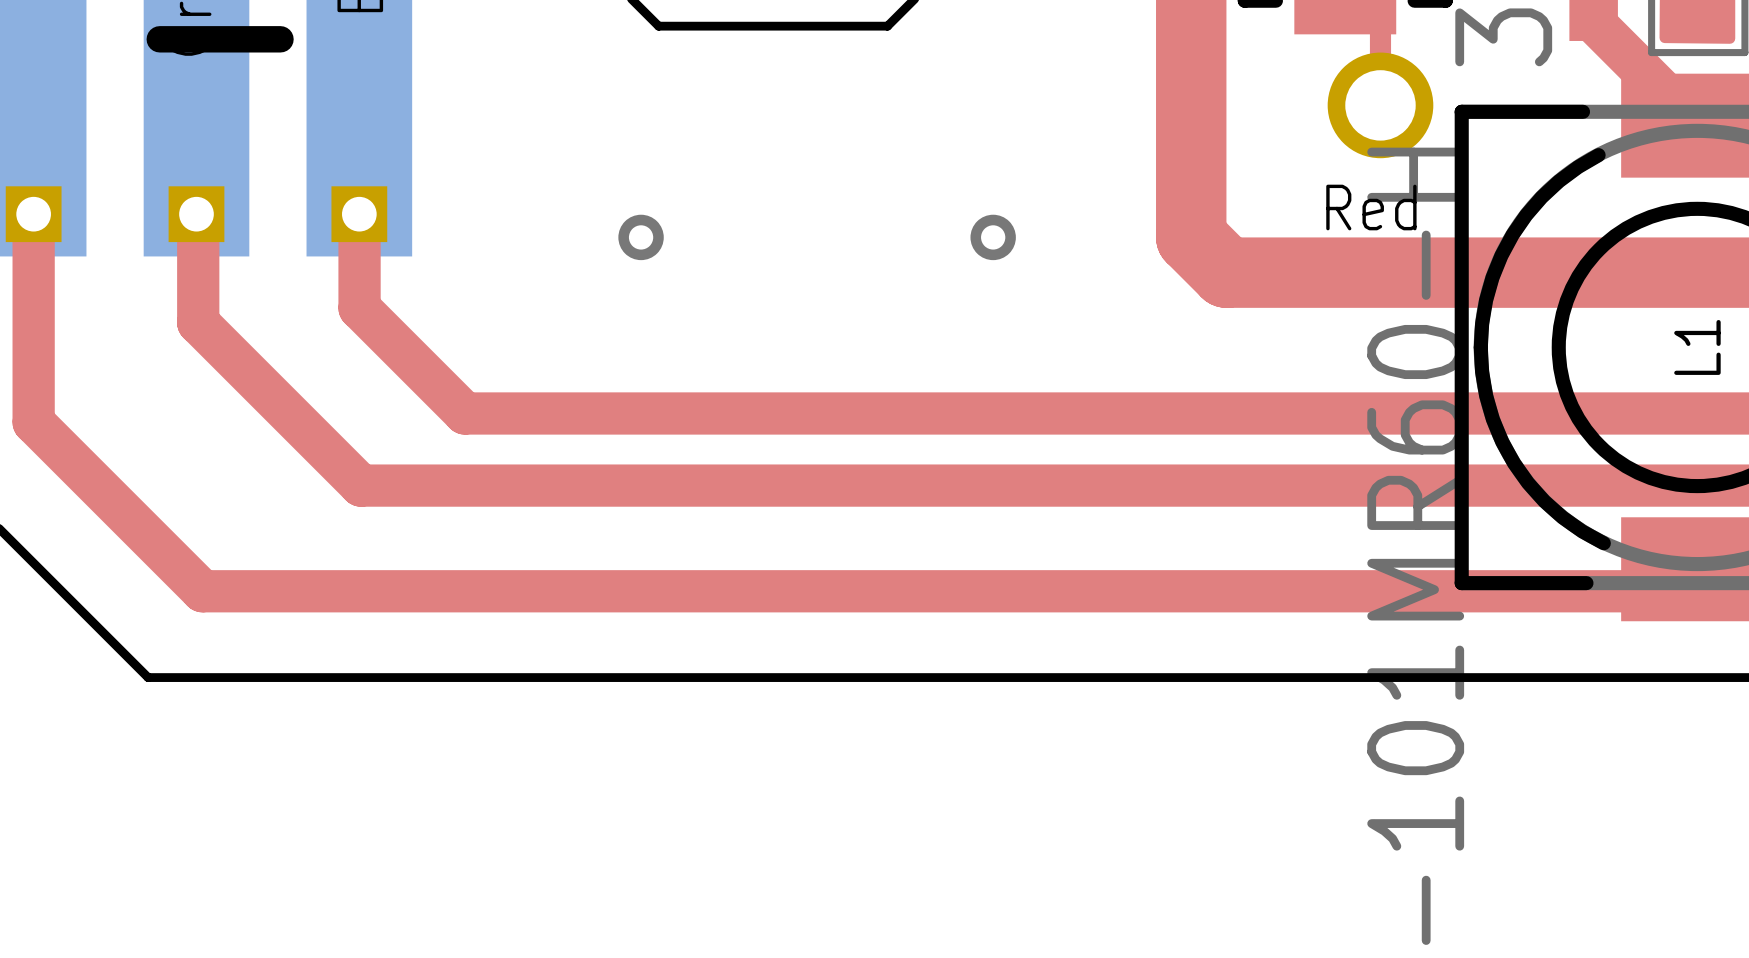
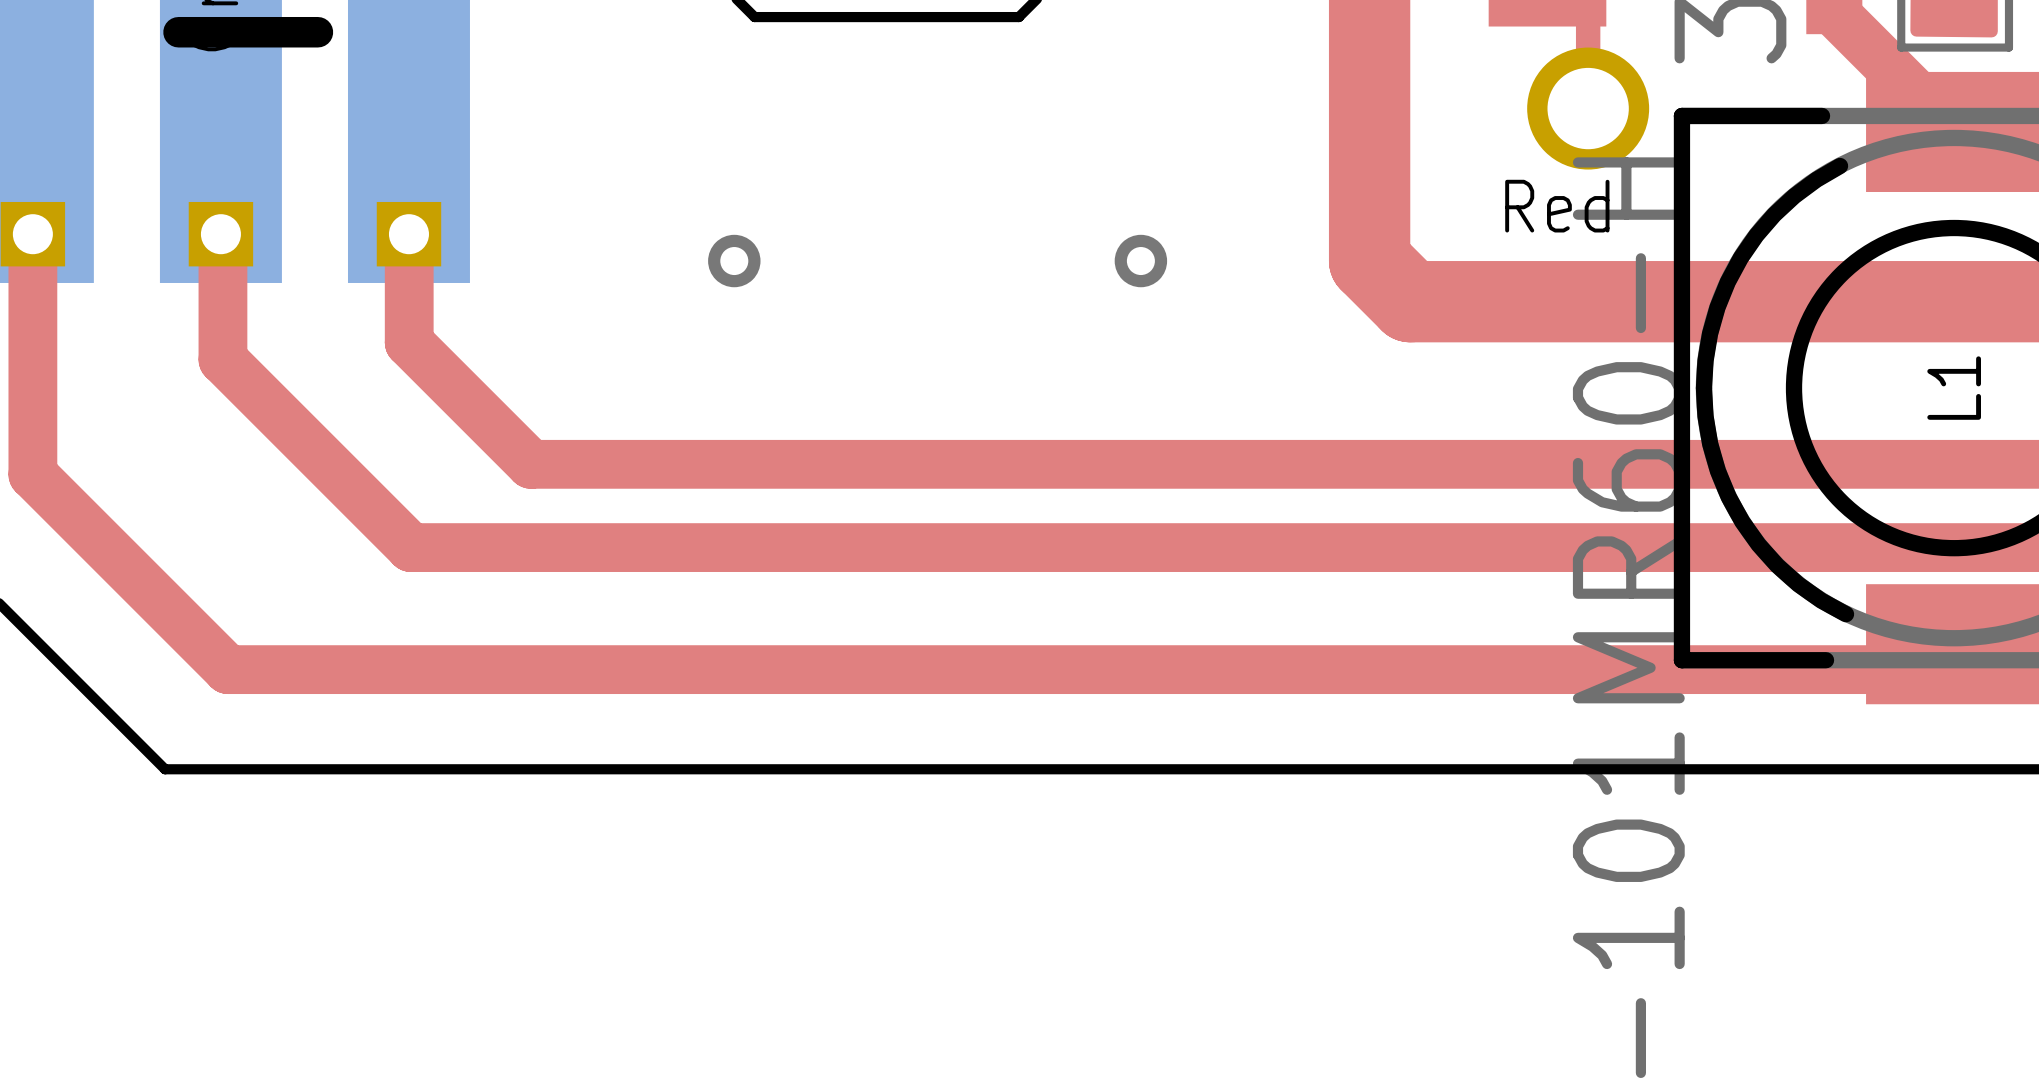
text position: Red (1371, 207) -> Red (1557, 206)

